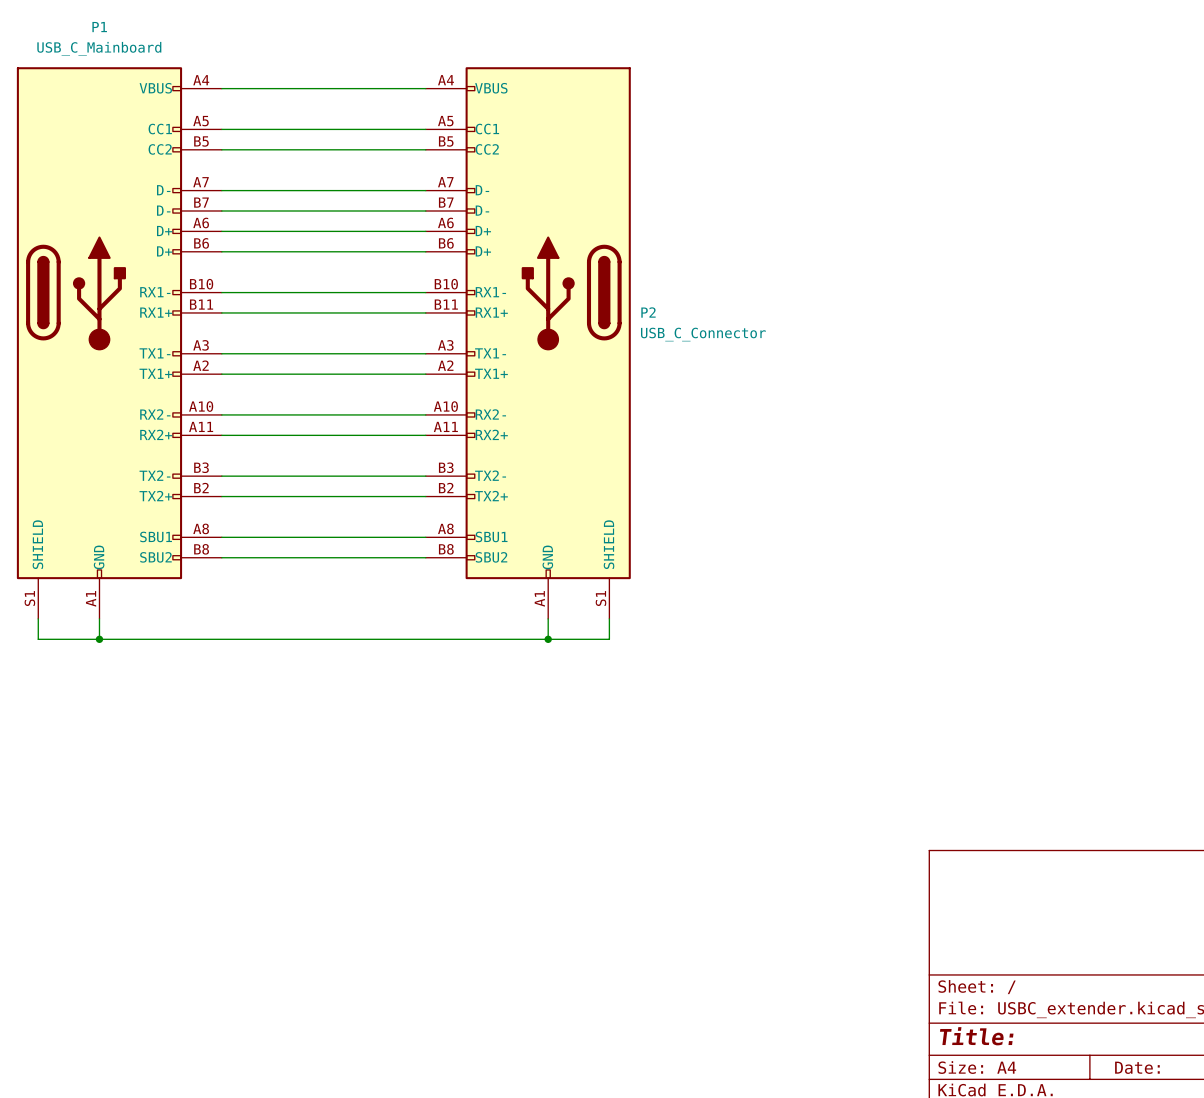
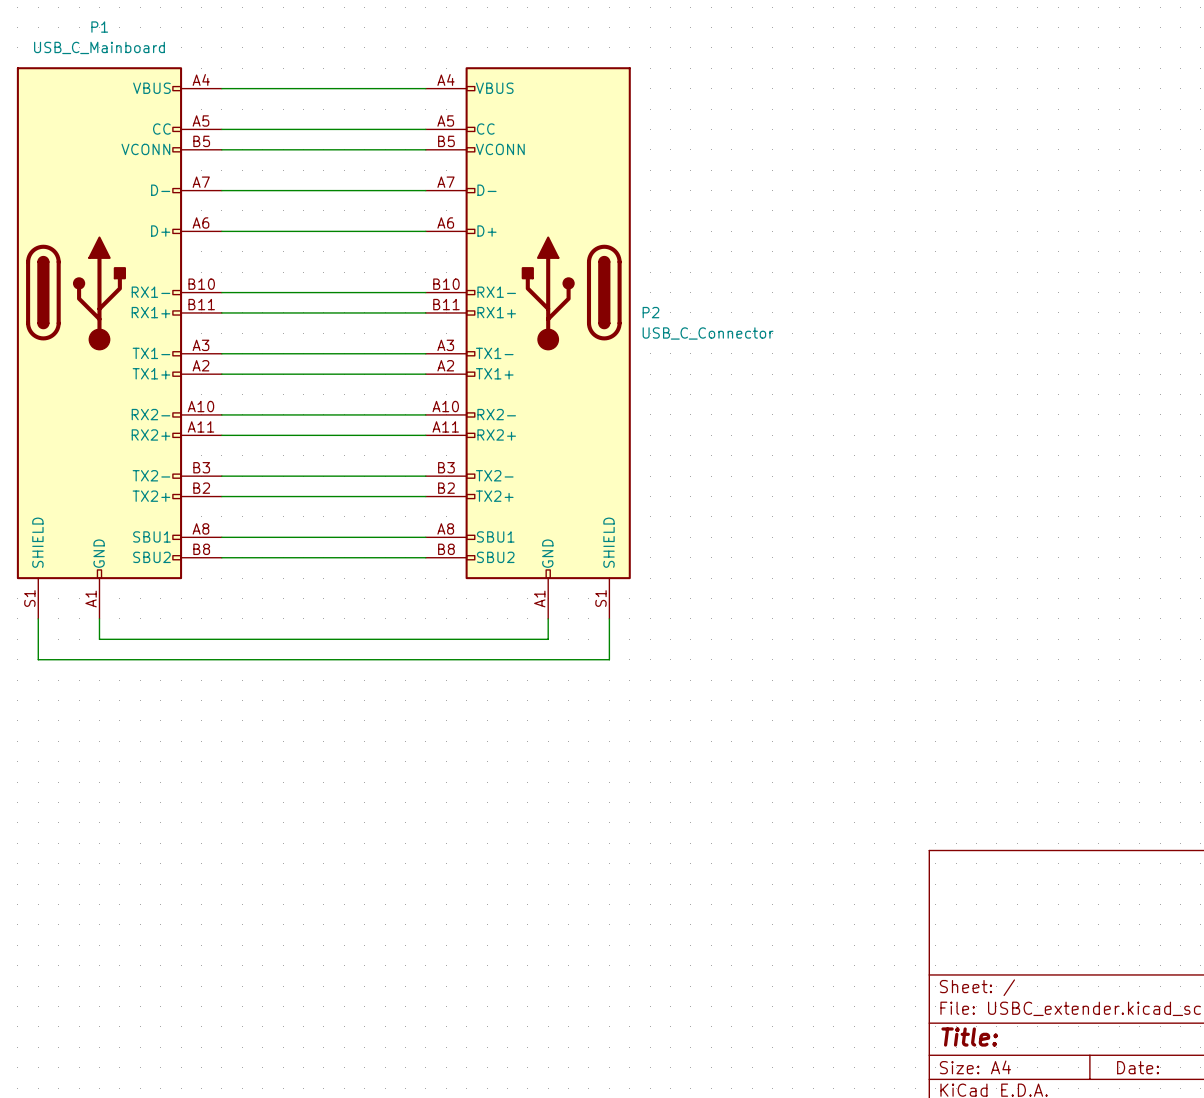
P1 symbol: [16, 67, 222, 619] -> [16, 67, 222, 619]
P2 symbol: [425, 67, 631, 619] -> [425, 67, 631, 619]
wire: (221, 210) (425, 210) -> none
wire: (221, 251) (425, 251) -> none
wire: (38, 639) (99, 639) -> none
junction: (99, 639) -> none
wire: (548, 639) (609, 639) -> (38, 639) (38, 659) (609, 659) (609, 639)
junction: (548, 639) -> none

